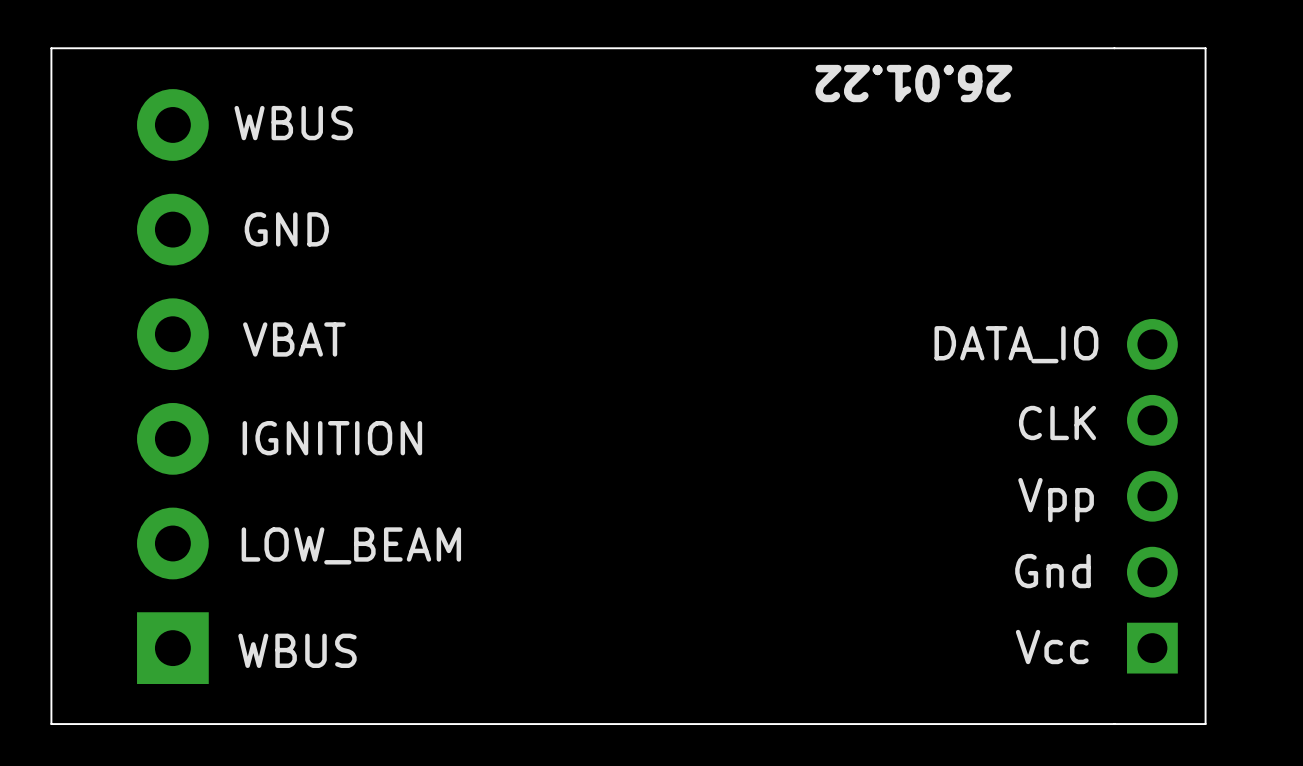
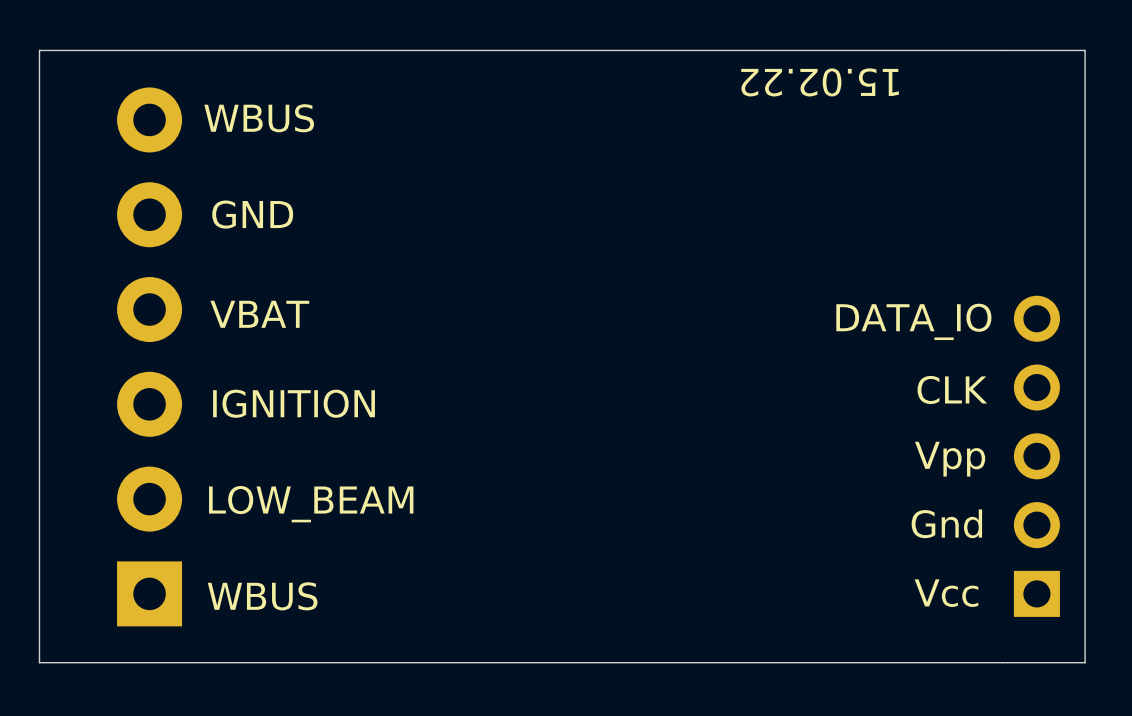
text: 26.01.22 (913, 83) -> 15.02.22 (820, 82)

